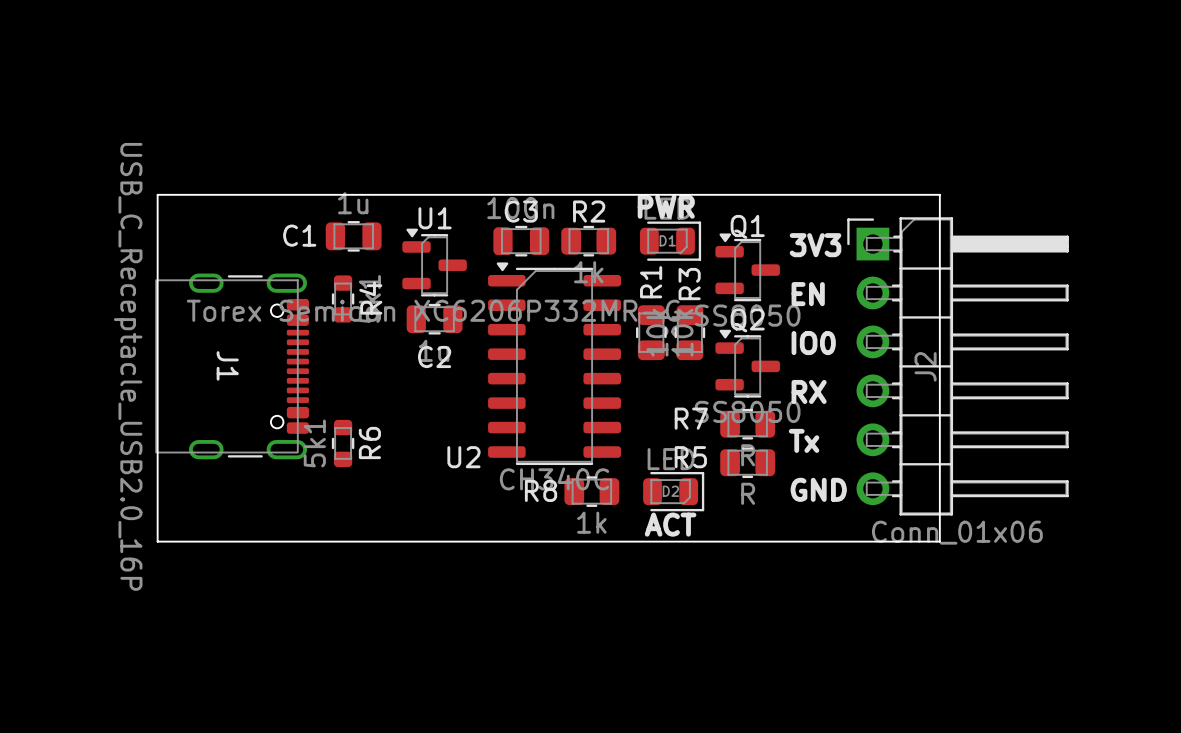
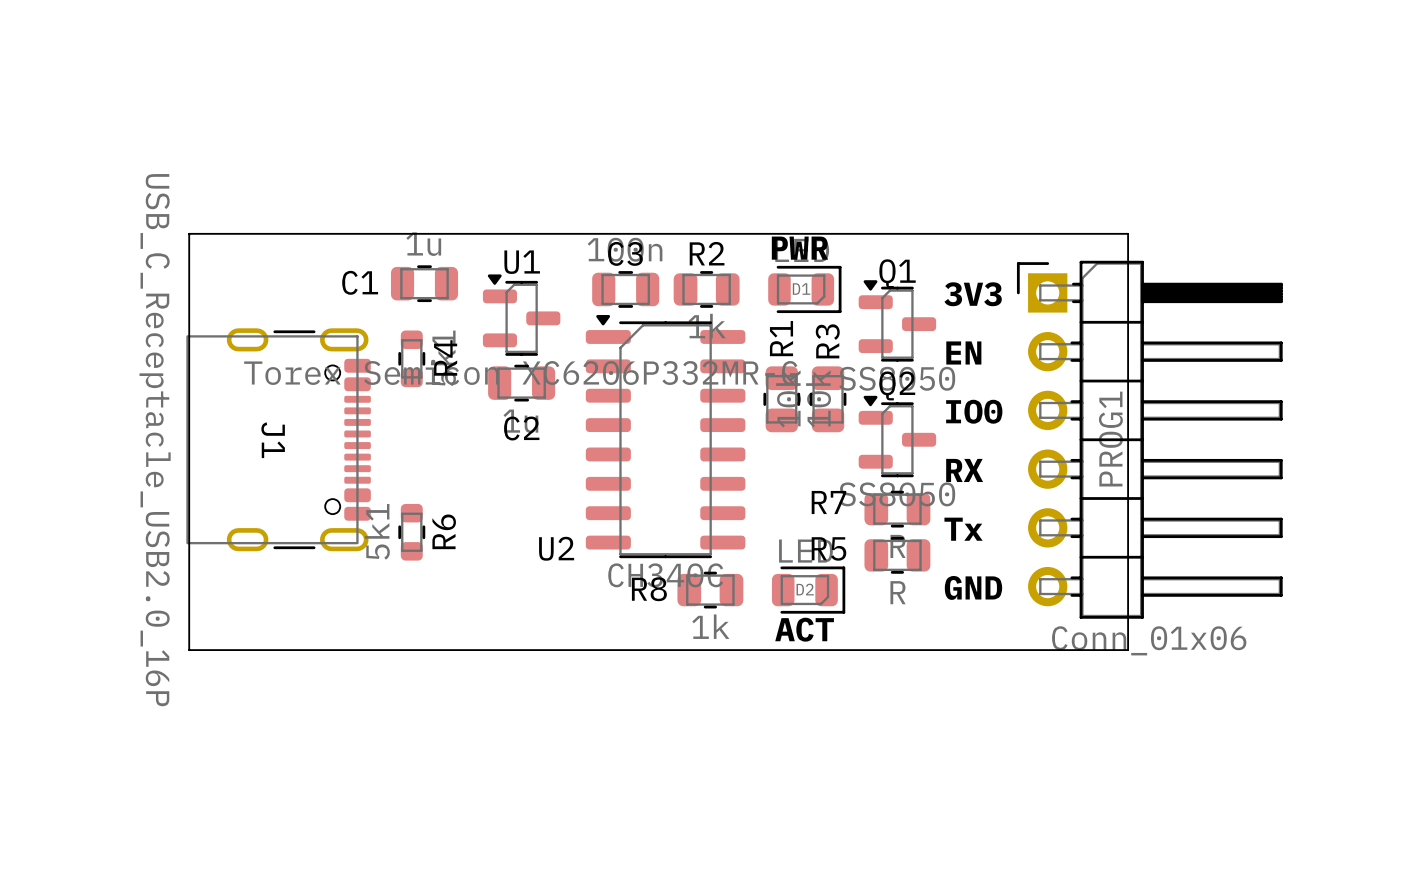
J2 name: J2 (925, 366) -> PROG1 (1110, 439)

